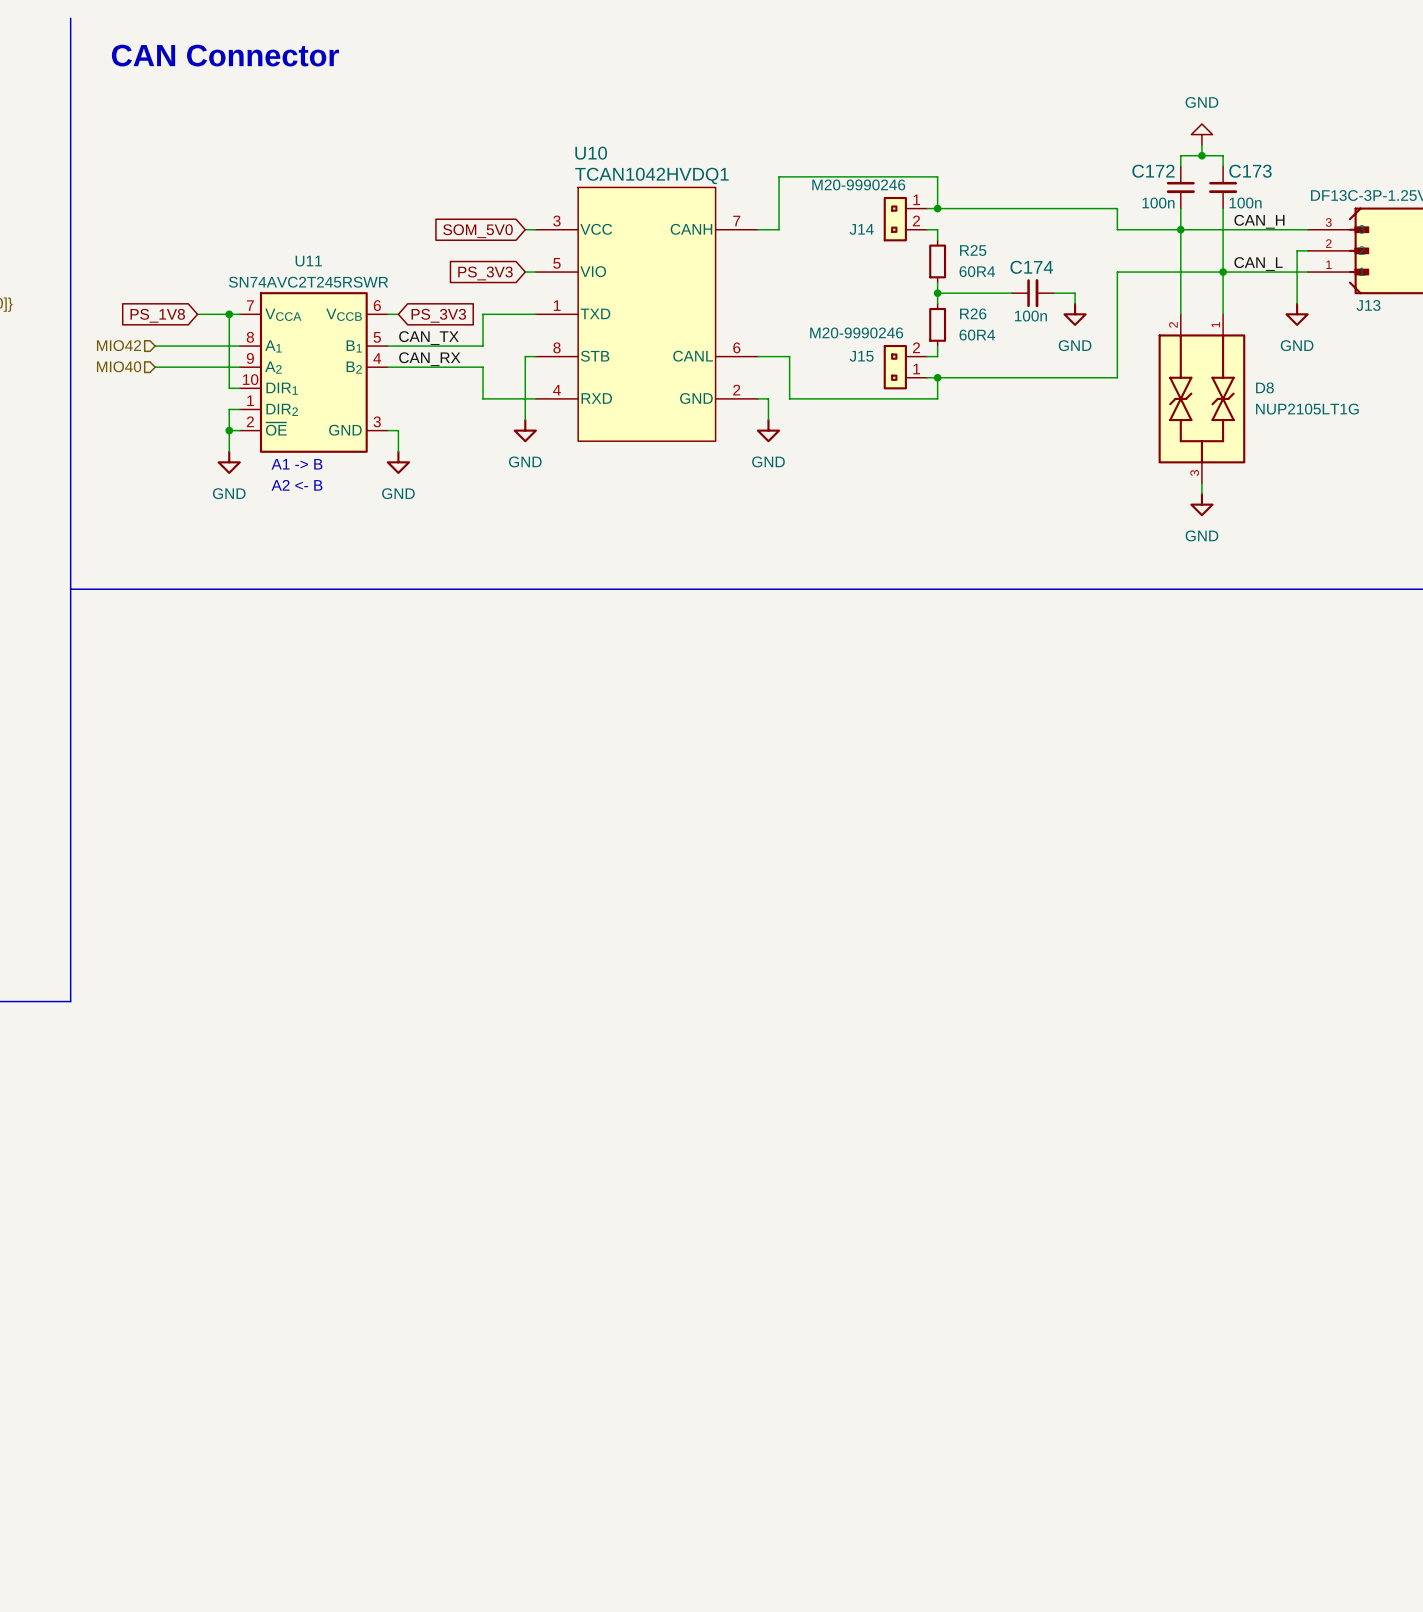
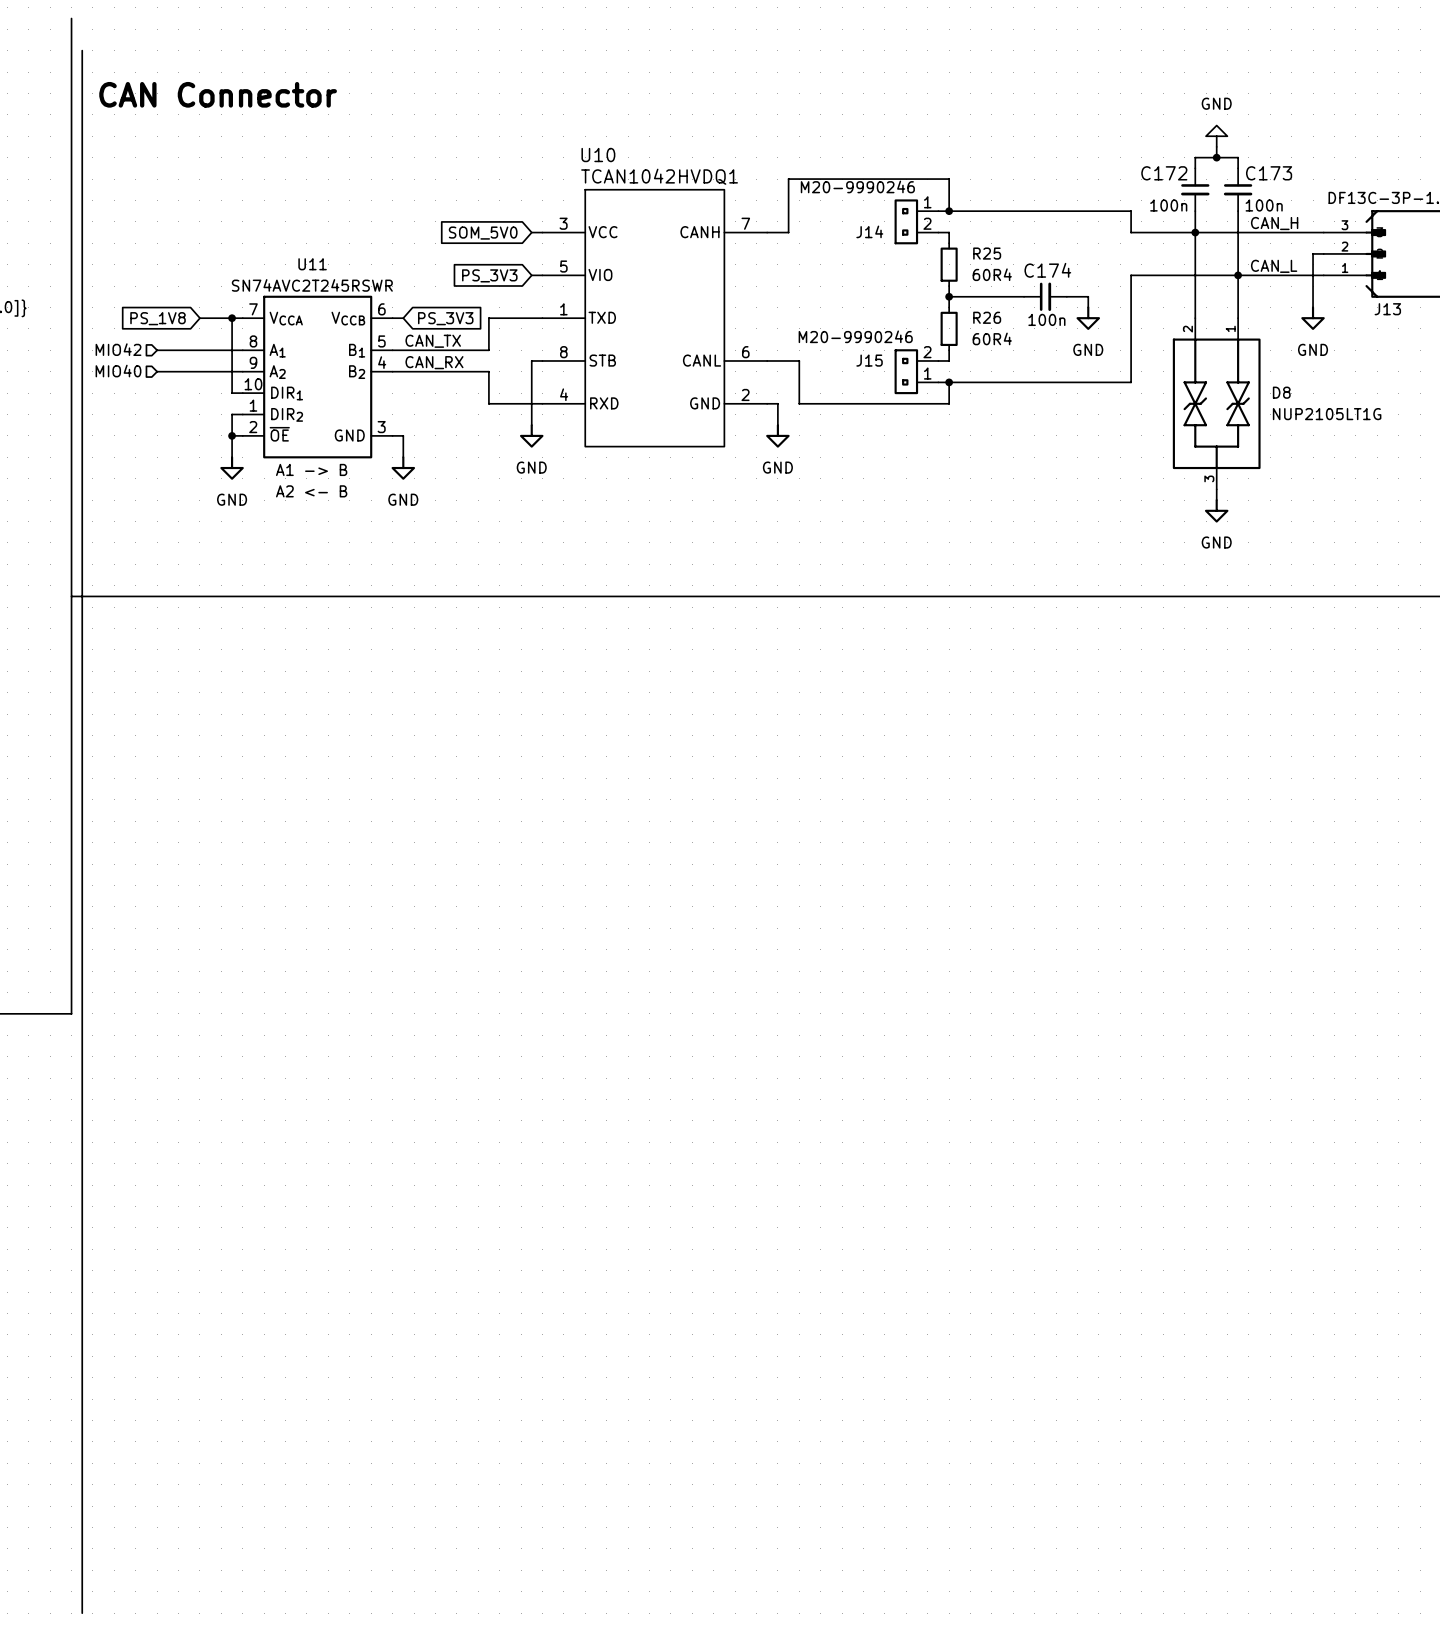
line: none -> (82, 50) (82, 1613)
text position: CAN Connector (225, 55) -> CAN Connector (218, 94)

